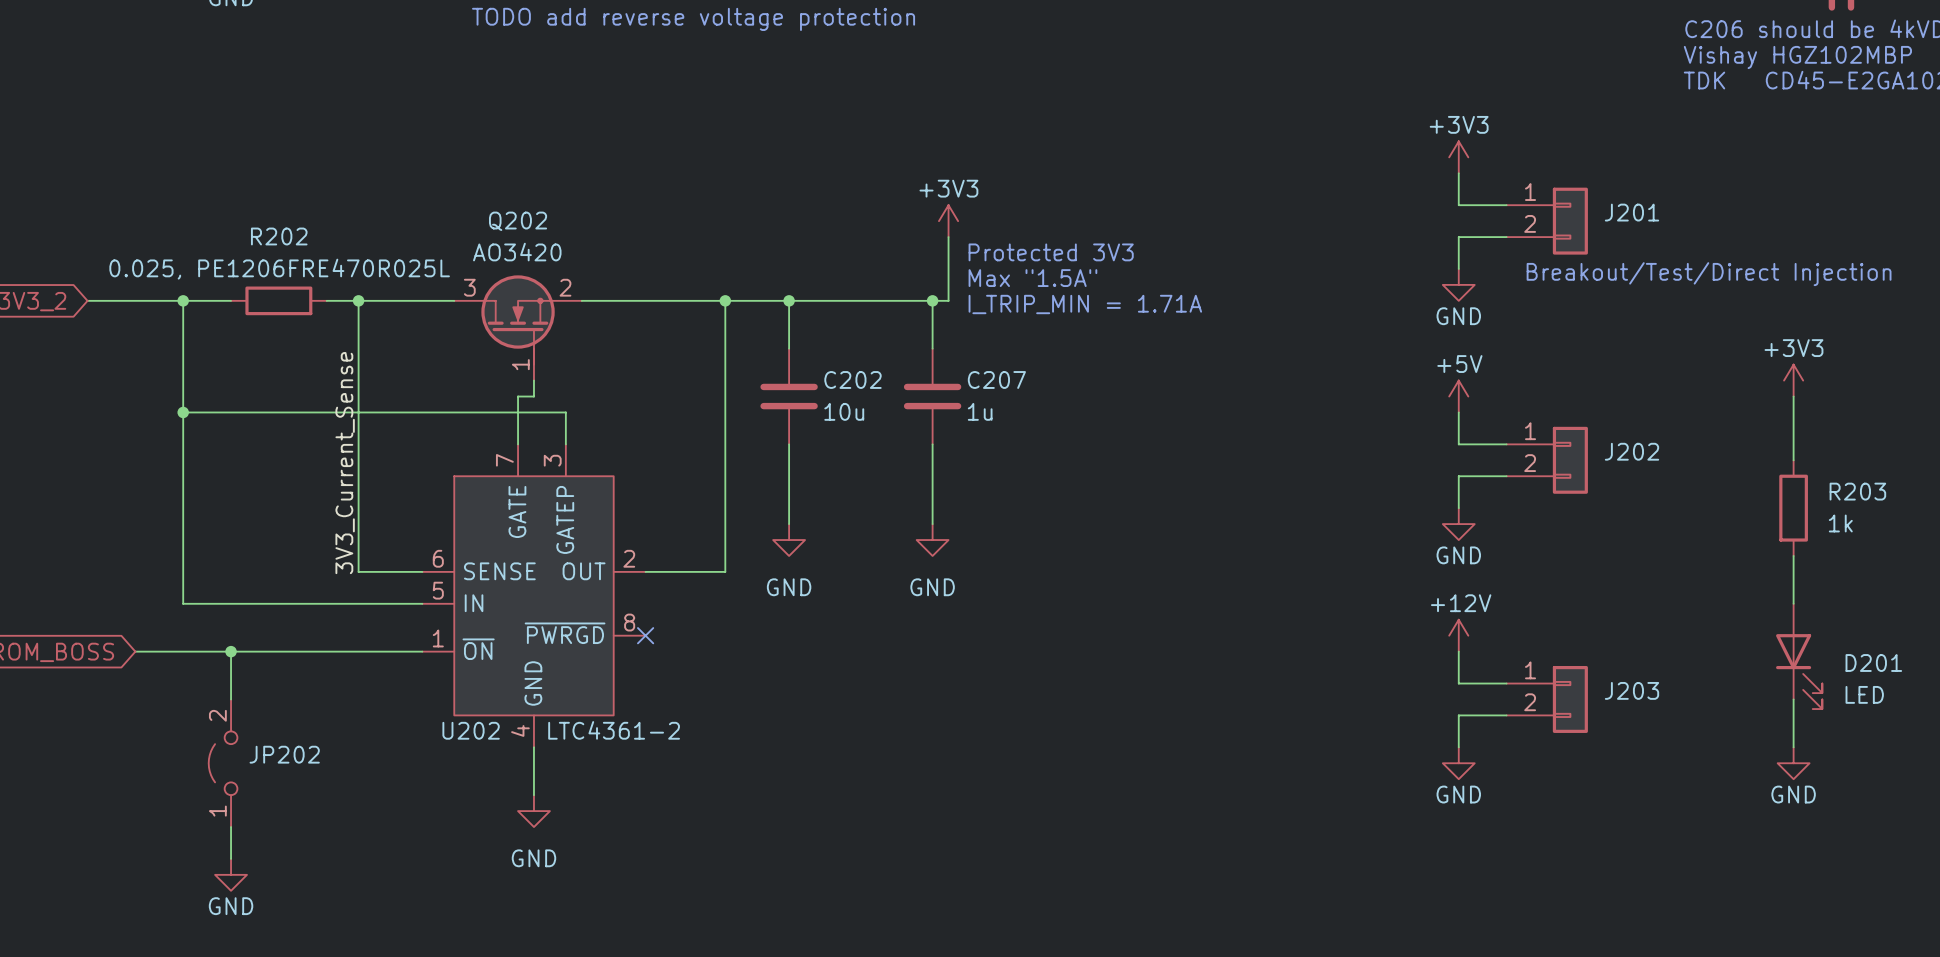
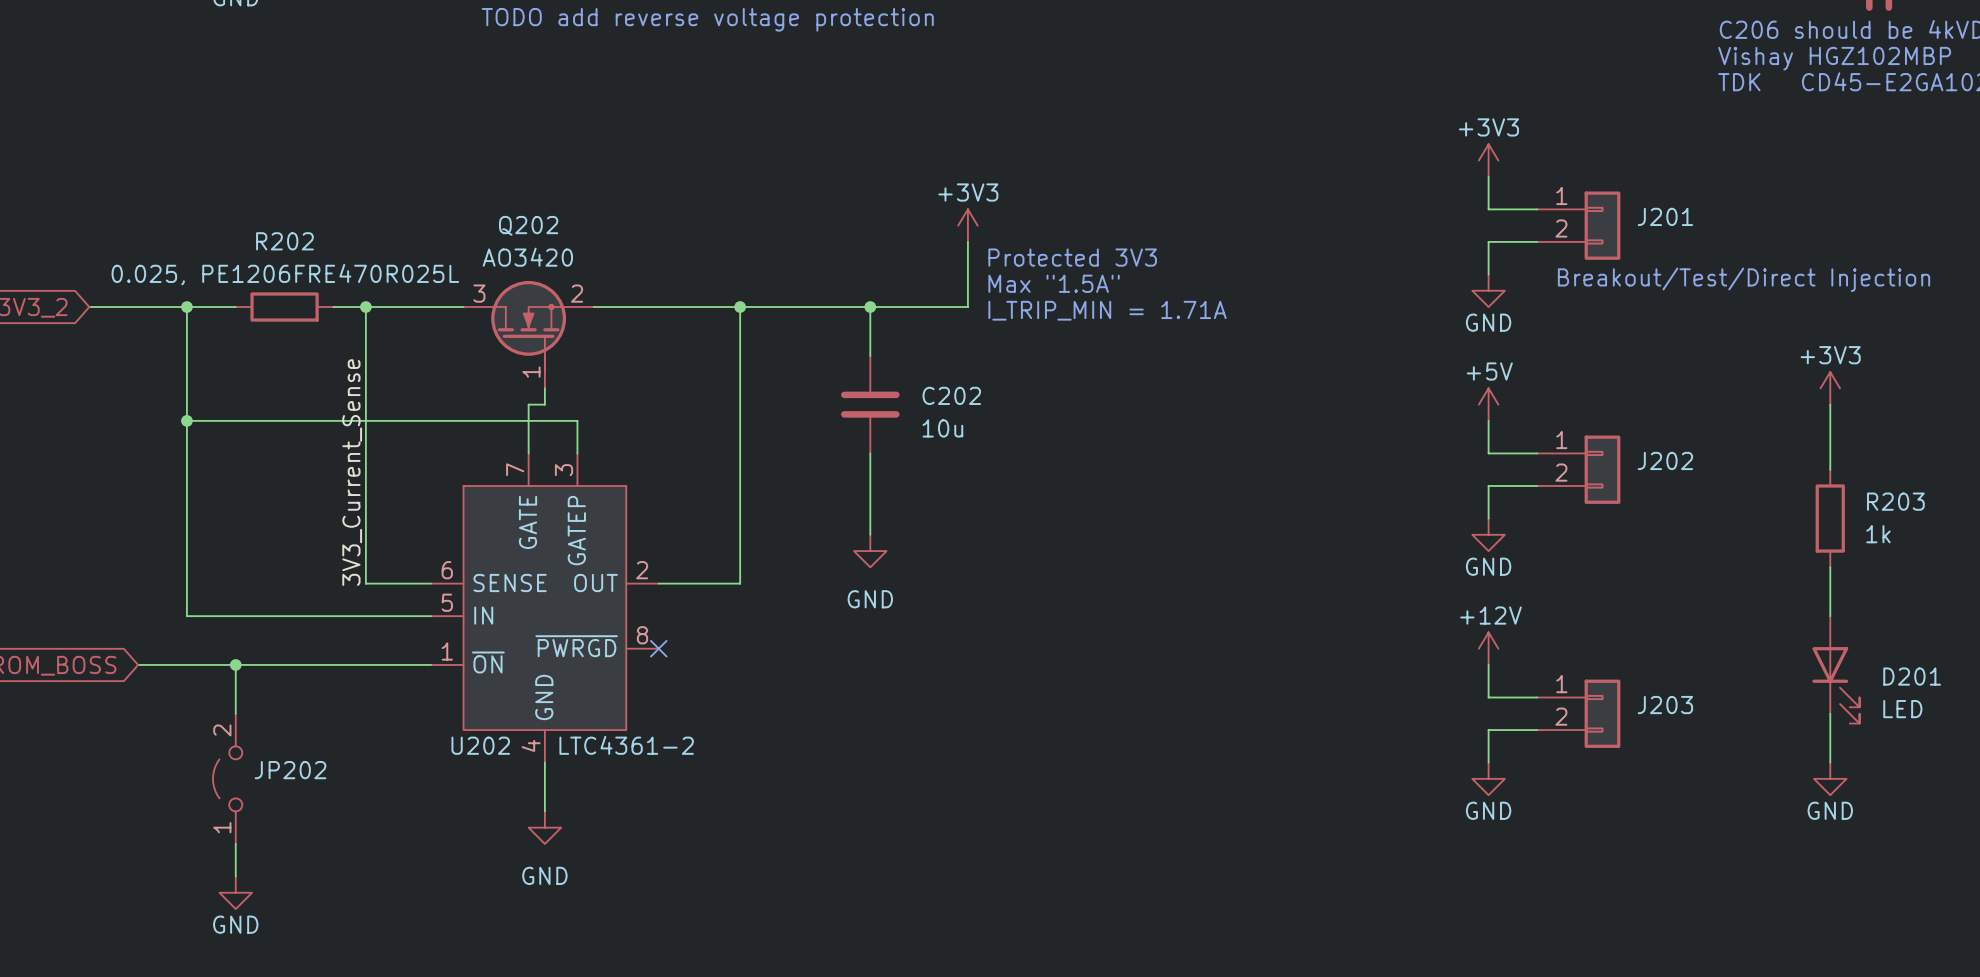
wire: (789, 300) (789, 348) -> (870, 307) (870, 355)
junction: (789, 300) -> none
junction: none -> (870, 307)
wire: (932, 300) (932, 348) -> none
junction: (932, 300) -> none
C202 name position: C202 (852, 379) -> C202 (951, 395)
C202 position: (789, 396) -> (870, 404)
C207: 1u (932, 396) -> none
C202 value position: 10u (844, 411) -> 10u (942, 428)
wire: (789, 444) (789, 524) -> (870, 453) (870, 534)
wire: (932, 444) (932, 524) -> none
power symbol: GND (789, 540) -> none
power symbol: none -> GND (870, 551)
power symbol: GND (932, 540) -> none

